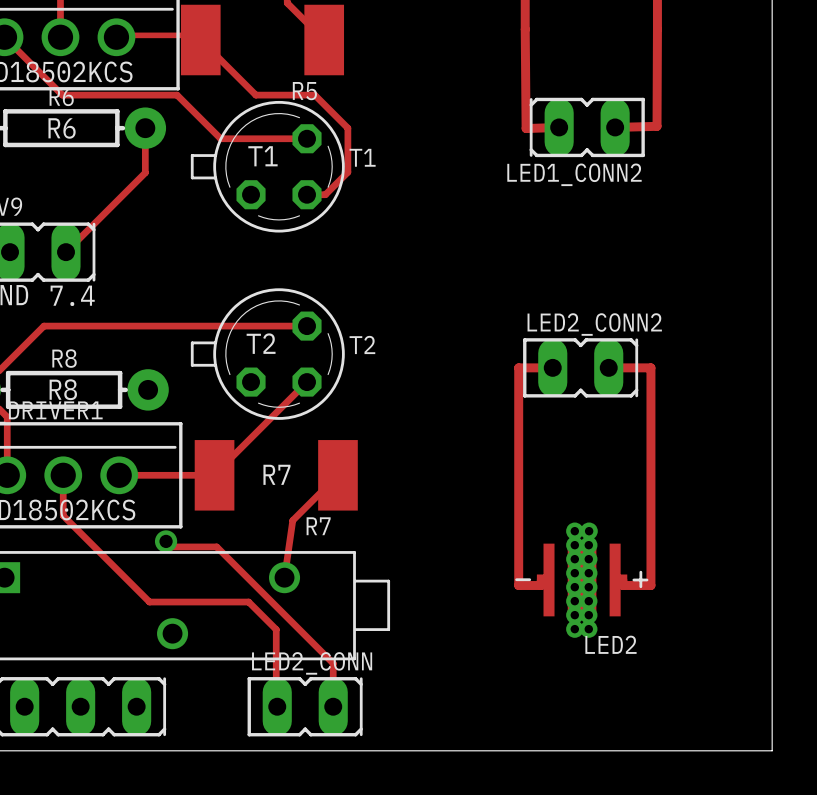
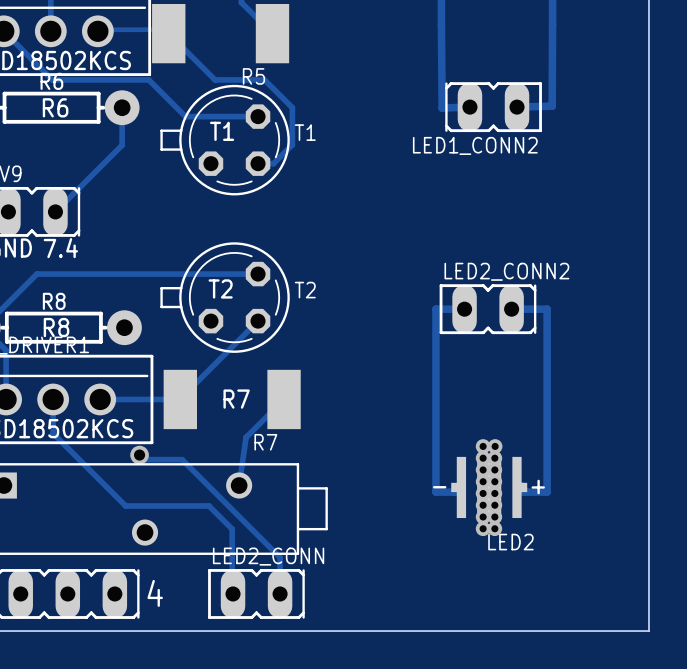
part text: none -> 4 (155, 593)

